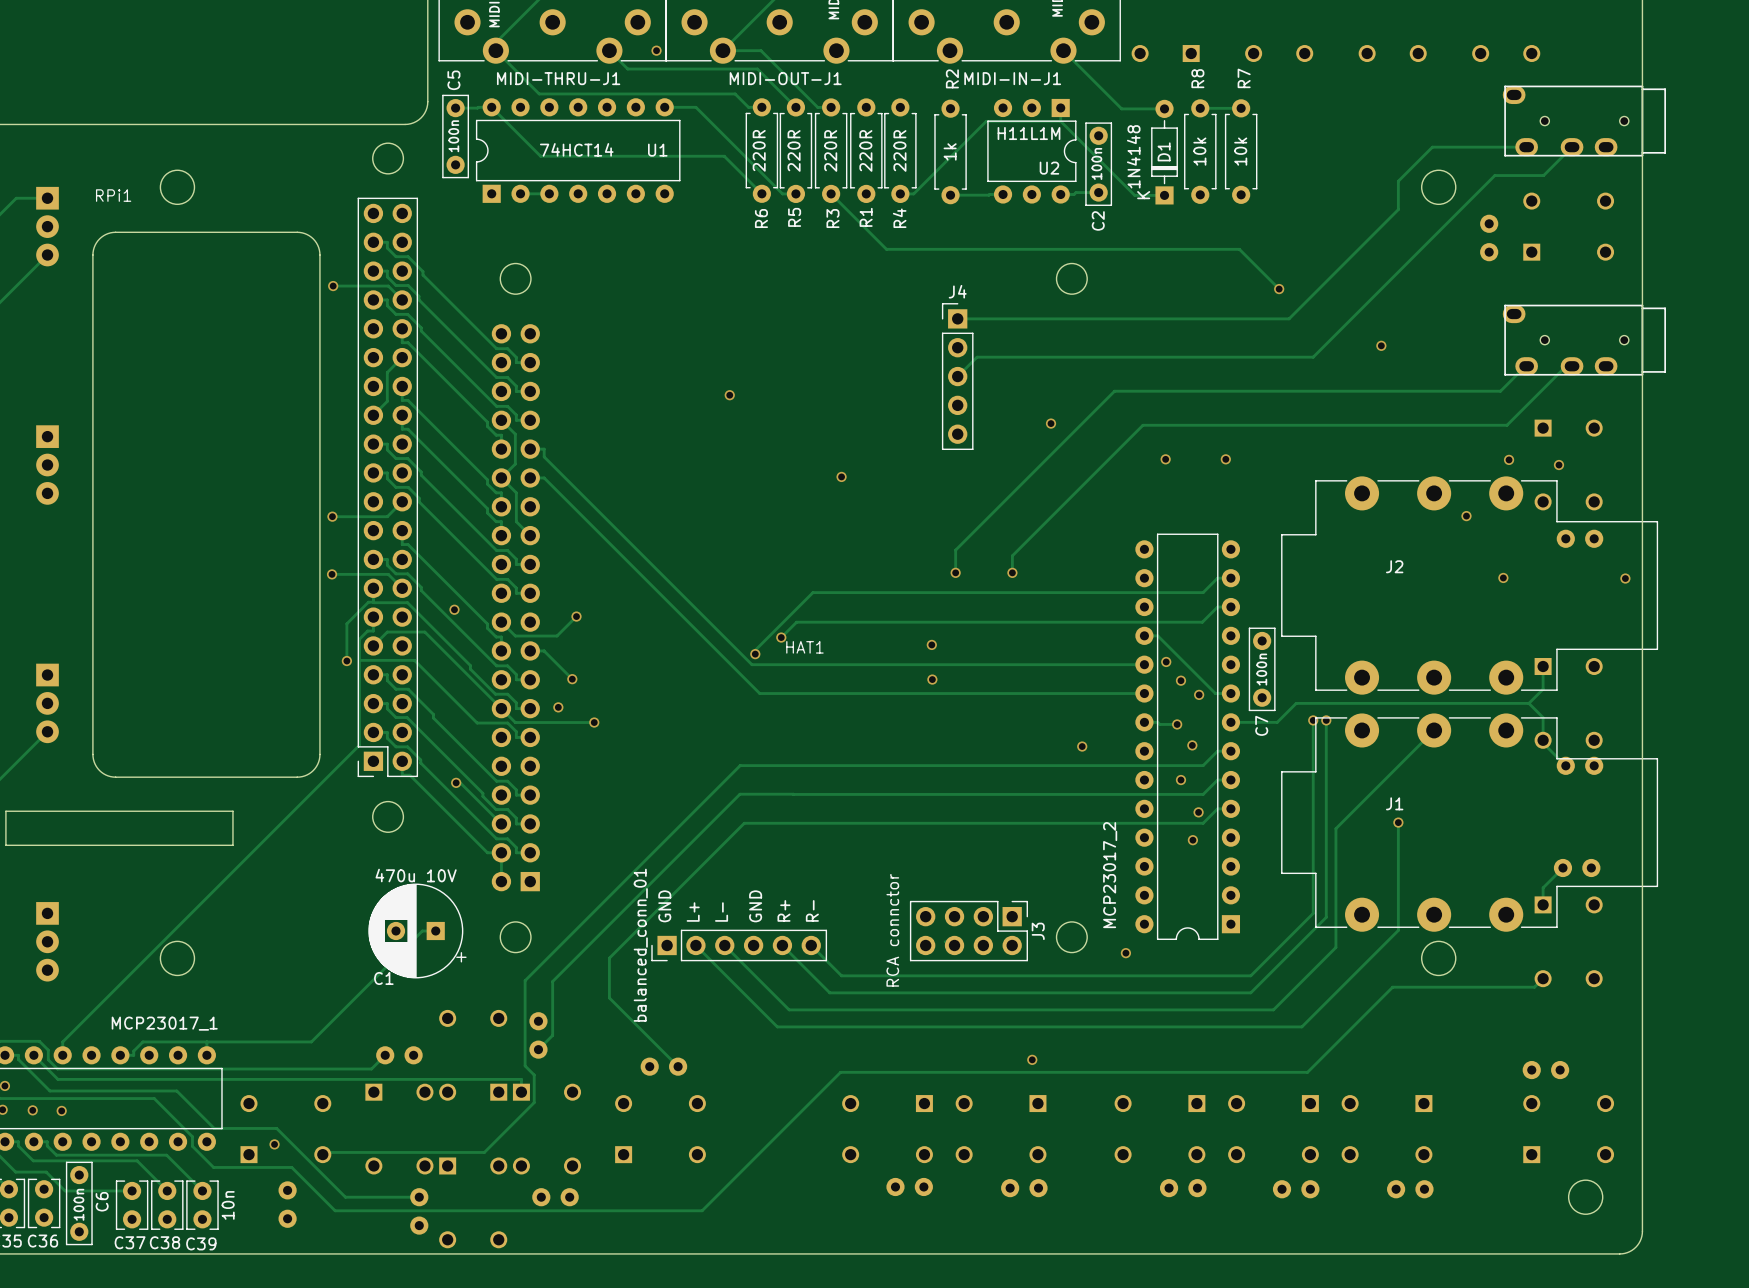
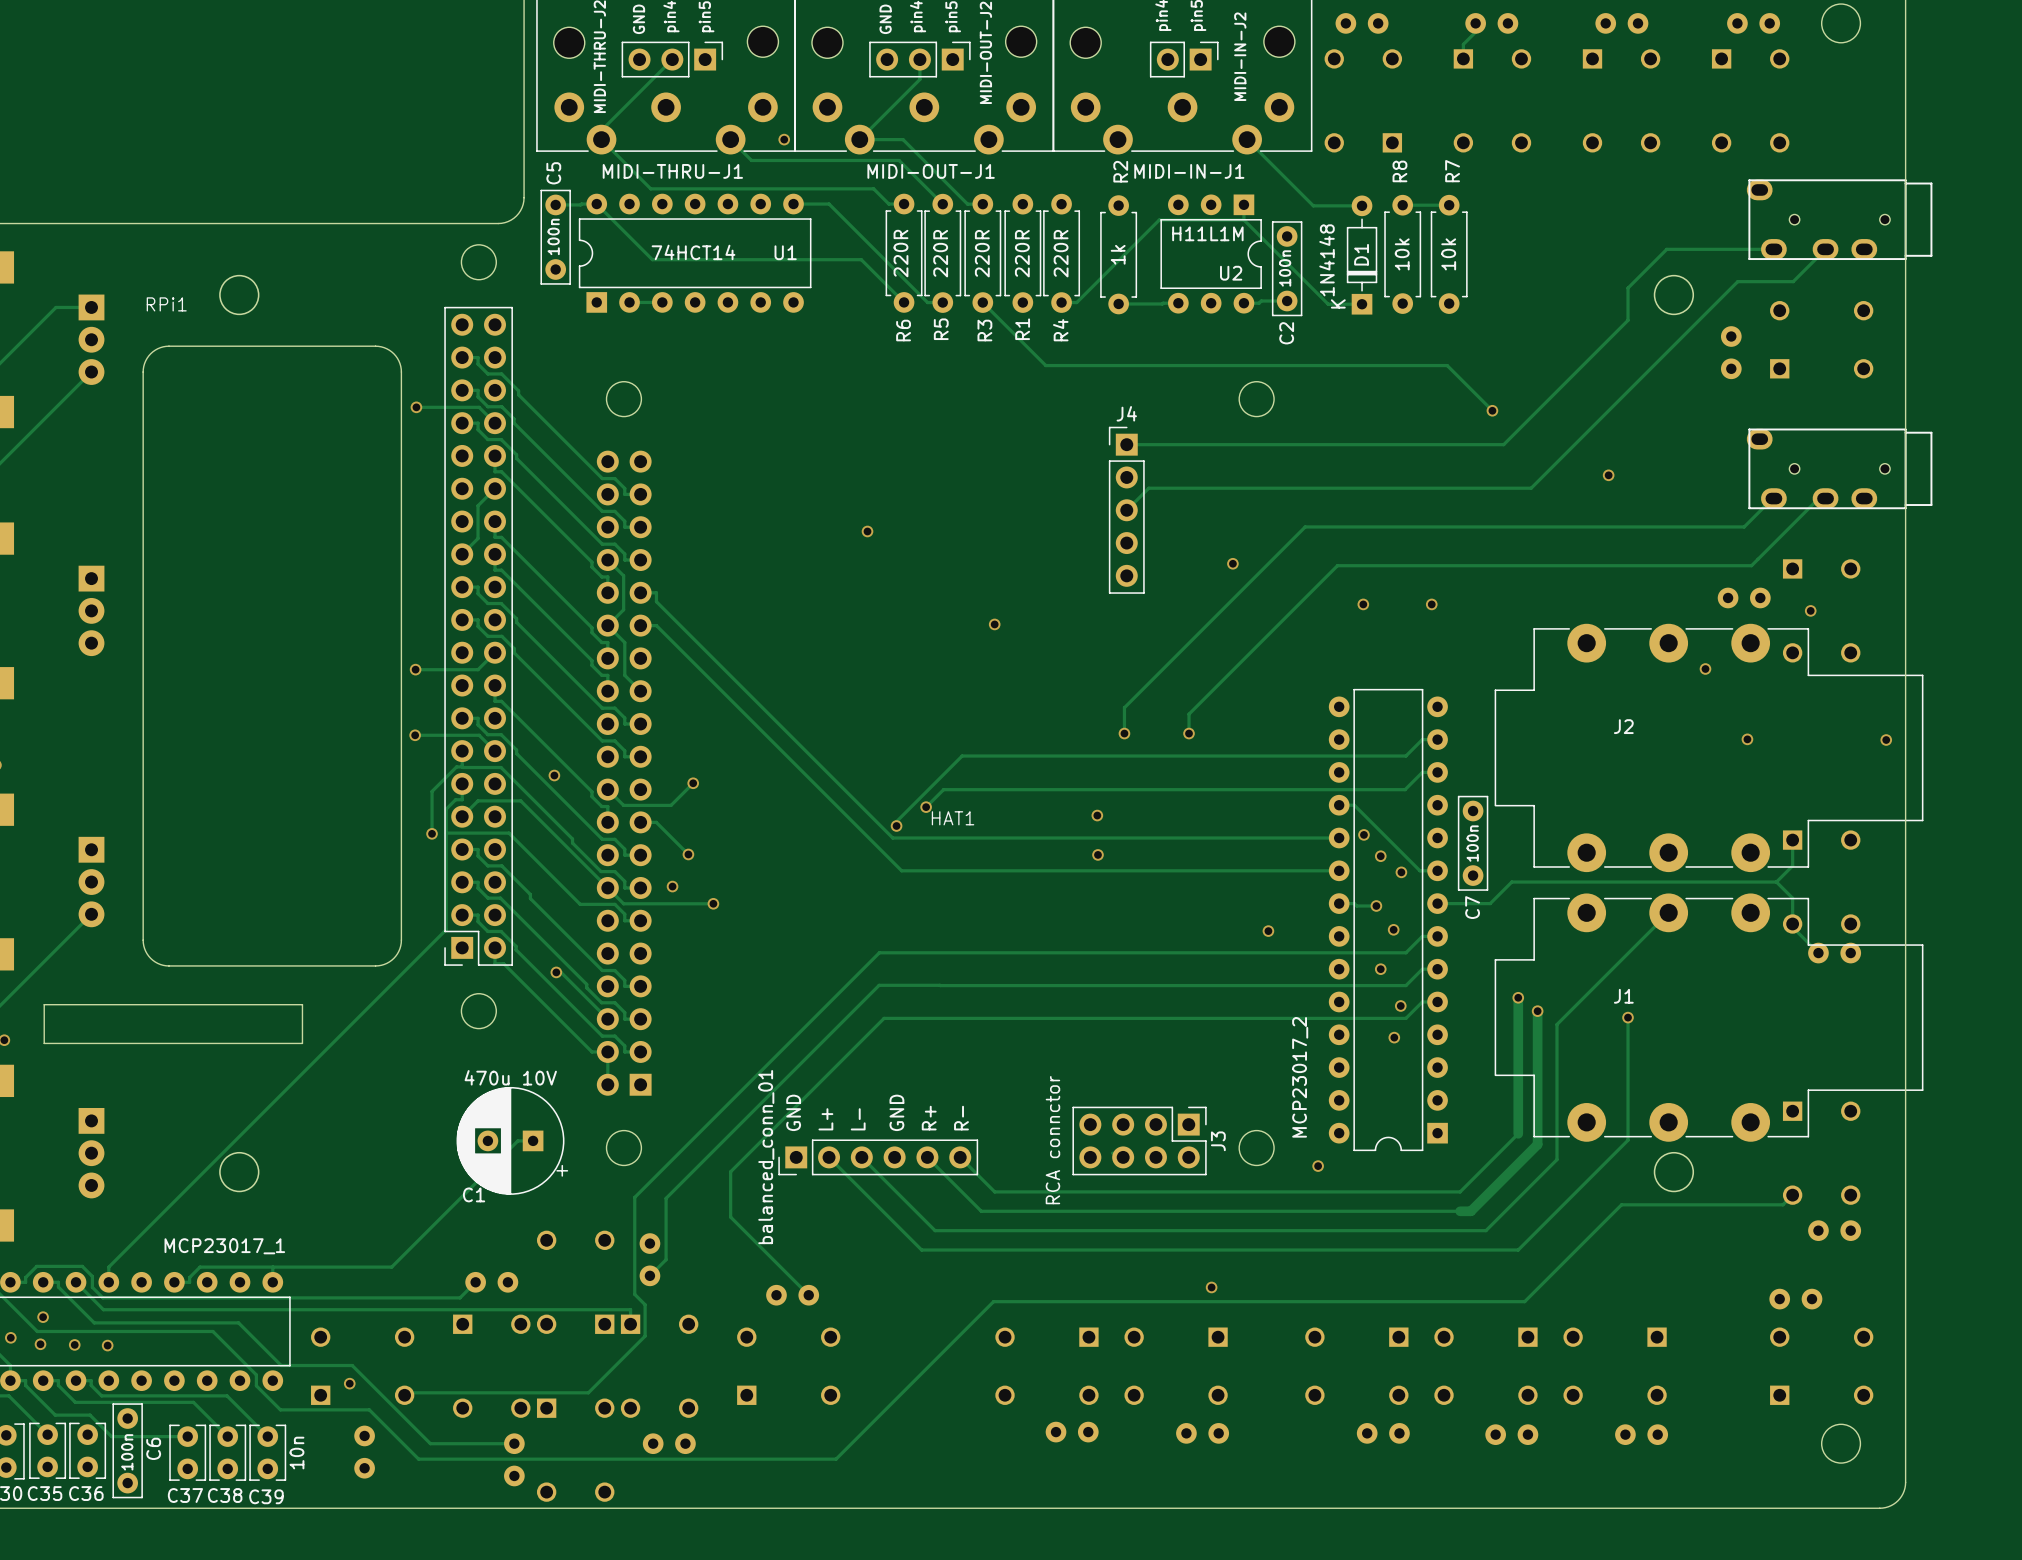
via: (1509, 459) -> none
part position: (1580, 538) -> (1744, 597)
track: (1313, 720) (1313, 913) (1301, 924) -> (1518, 997) (1518, 1133)
via: (1313, 720) -> none
track: (1326, 720) (1326, 917) (1250, 992) -> (1537, 1011) (1537, 1144) (1470, 1211) (1460, 1211)
via: (1326, 720) -> none
via: none -> (1518, 997)
via: none -> (1537, 1011)
track: (1562, 868) (1543, 887) (1543, 904) -> none
part position: (1577, 868) -> (1834, 1230)

